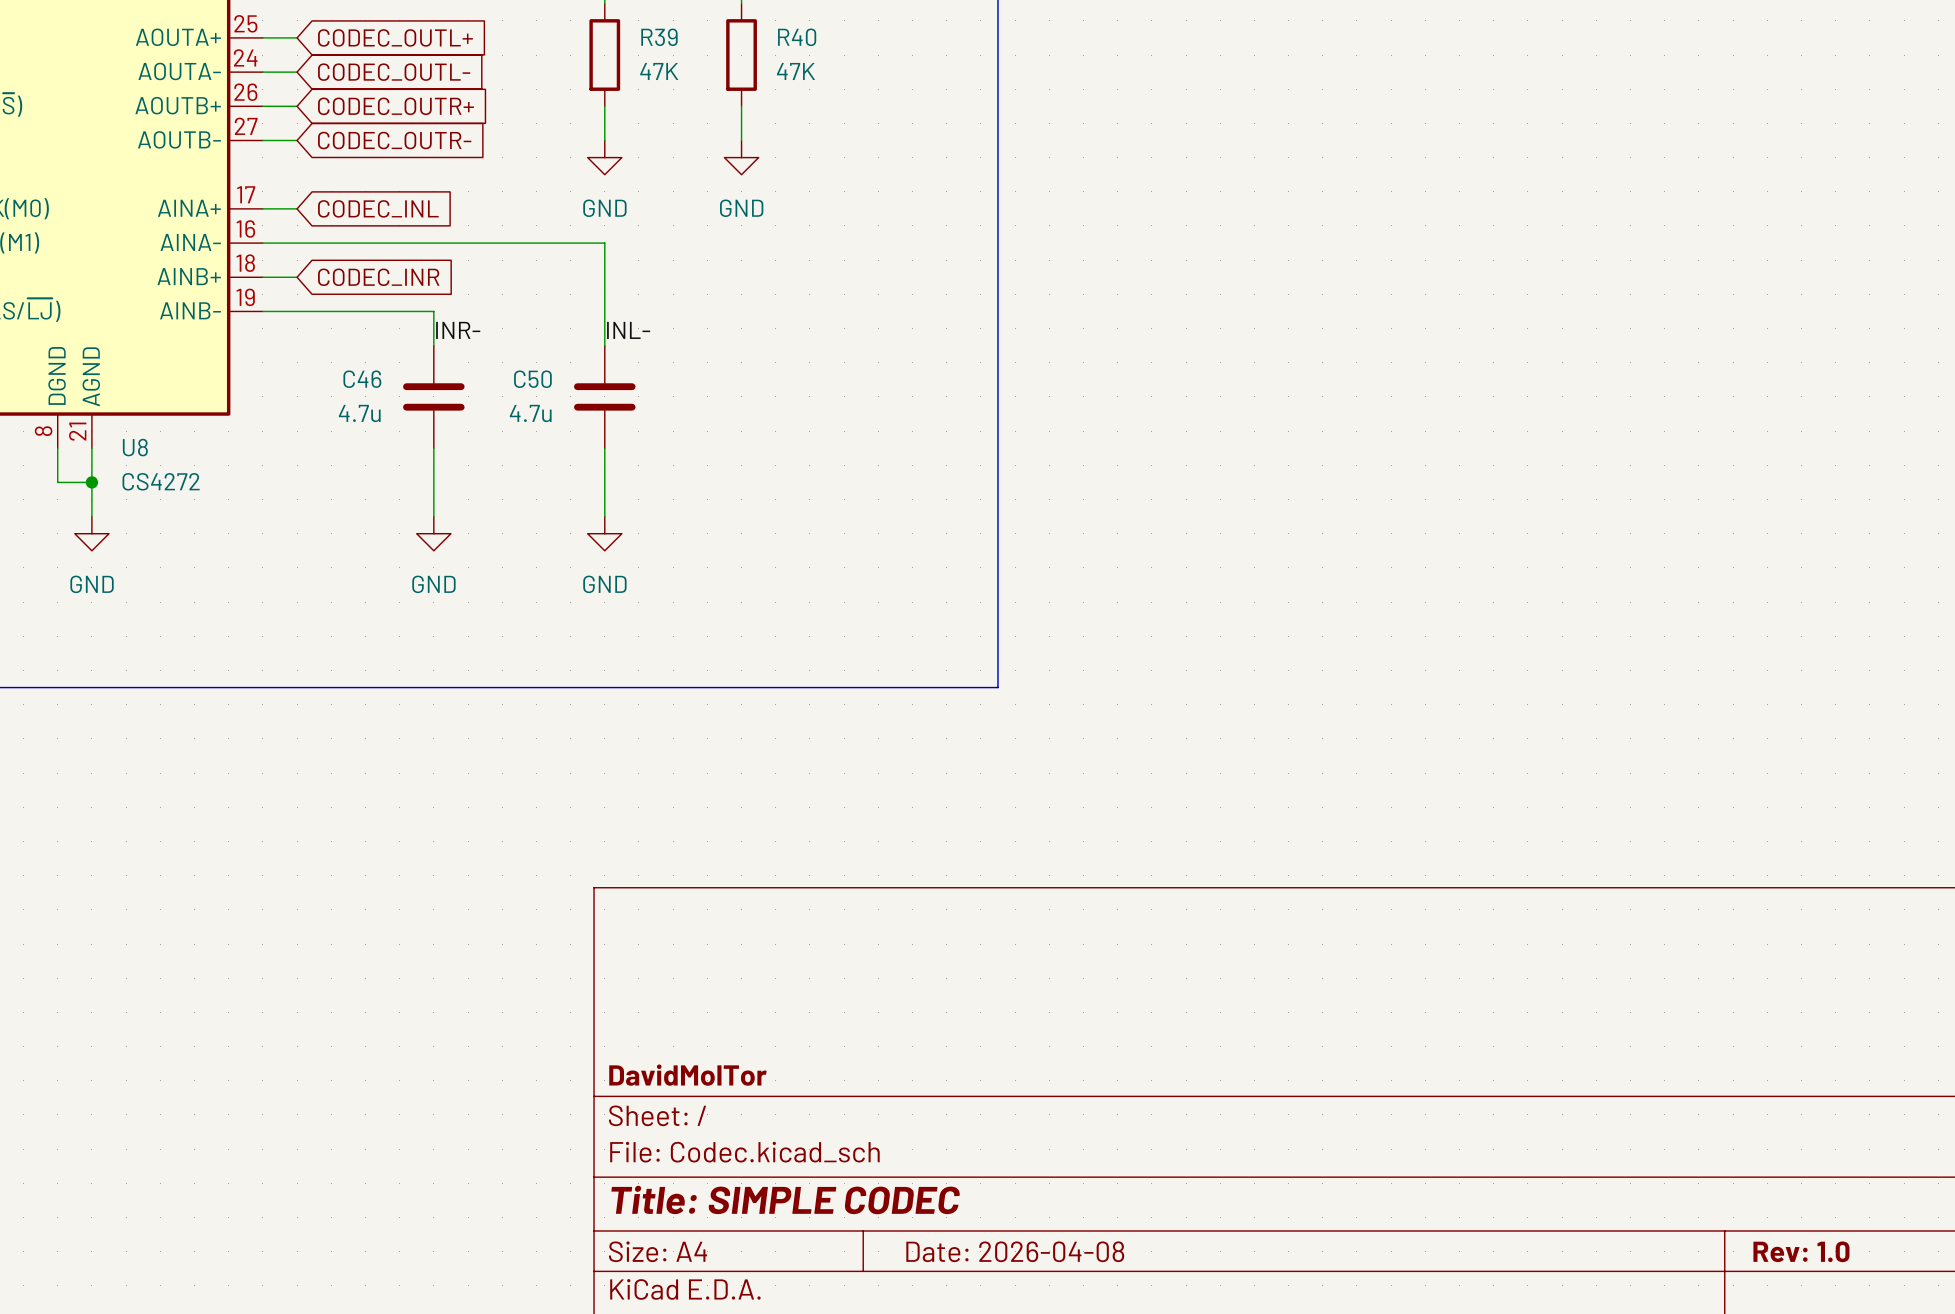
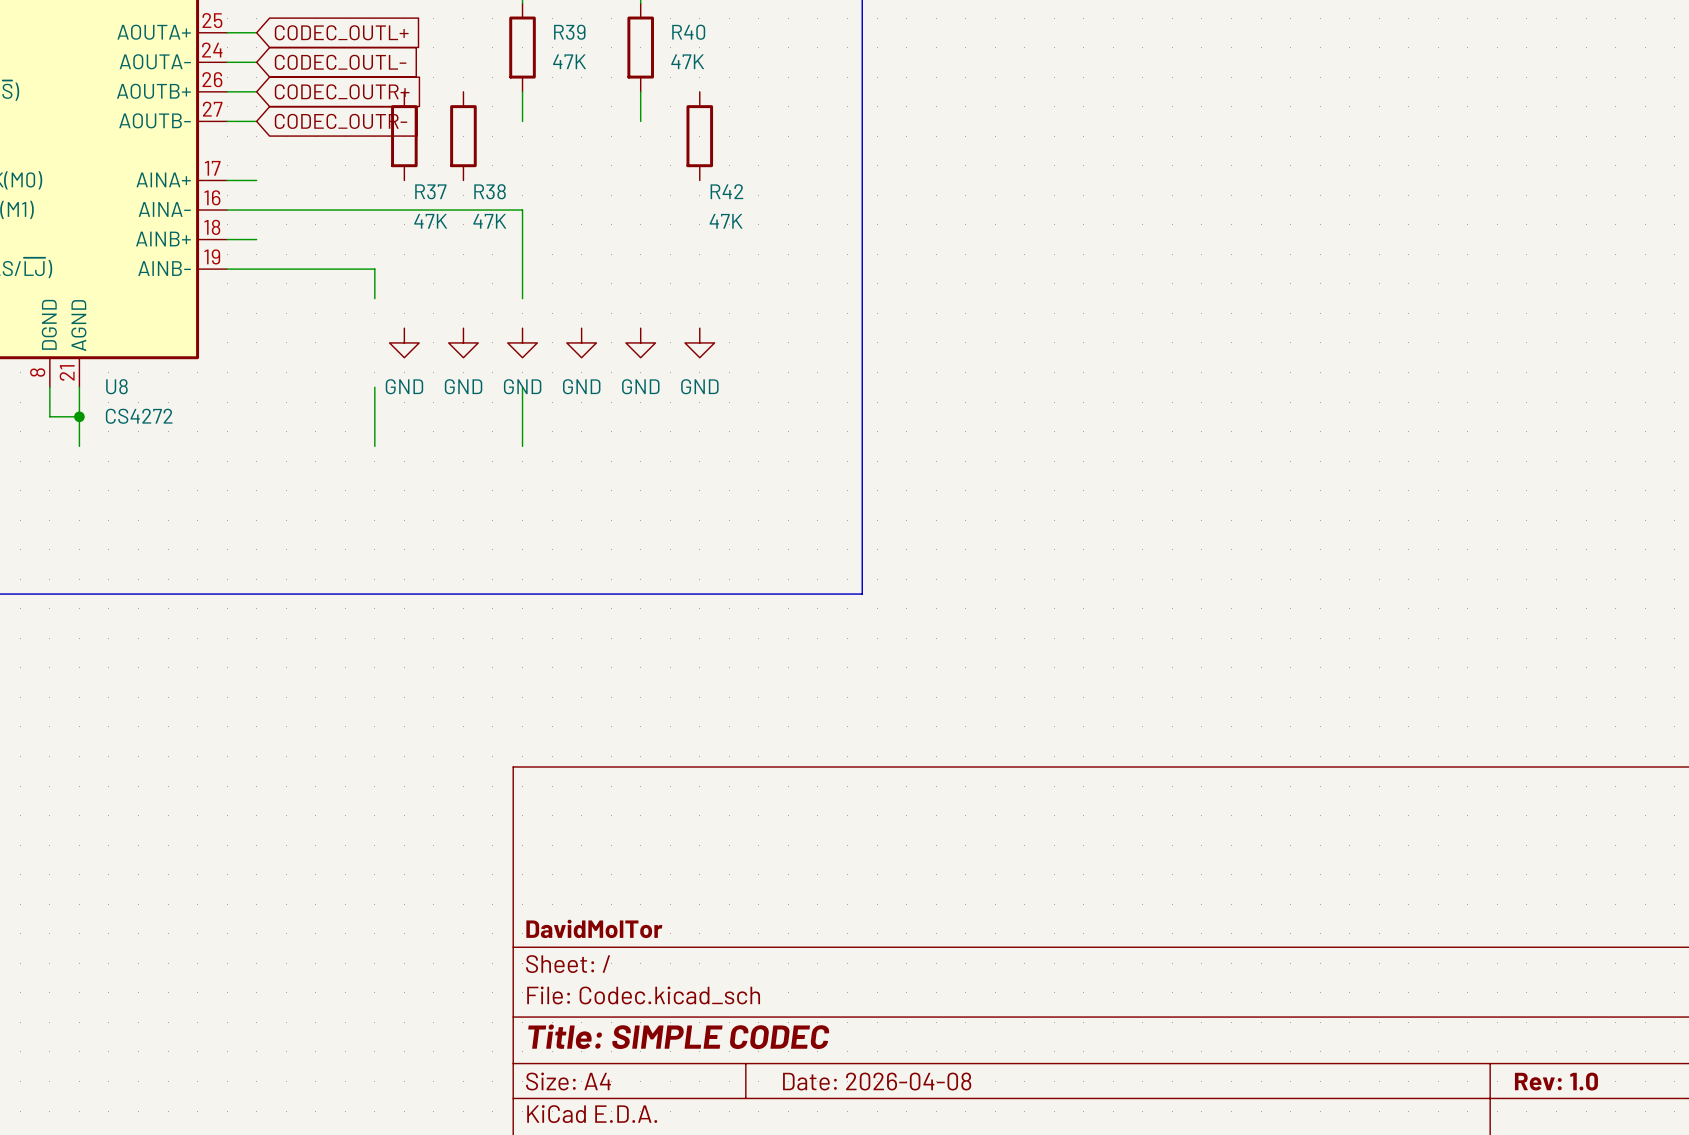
R37: none -> 47K (404, 136)
R38: none -> 47K (463, 136)
power symbol: GND (604, 157) -> none
power symbol: GND (741, 157) -> none
R42: none -> 47K (699, 136)
global label: CODEC_INL (378, 208) -> none
global label: CODEC_INR (378, 277) -> none
label: INR- (458, 330) -> none
label: INL- (628, 330) -> none
C46: 4.7u (433, 396) -> none
power symbol: none -> GND (404, 342)
power symbol: none -> GND (463, 342)
power symbol: none -> GND (522, 342)
C50: 4.7u (604, 396) -> none
power symbol: none -> GND (581, 342)
power symbol: none -> GND (640, 342)
power symbol: none -> GND (699, 342)
power symbol: GND (91, 533) -> none
power symbol: GND (433, 533) -> none
power symbol: GND (604, 533) -> none

